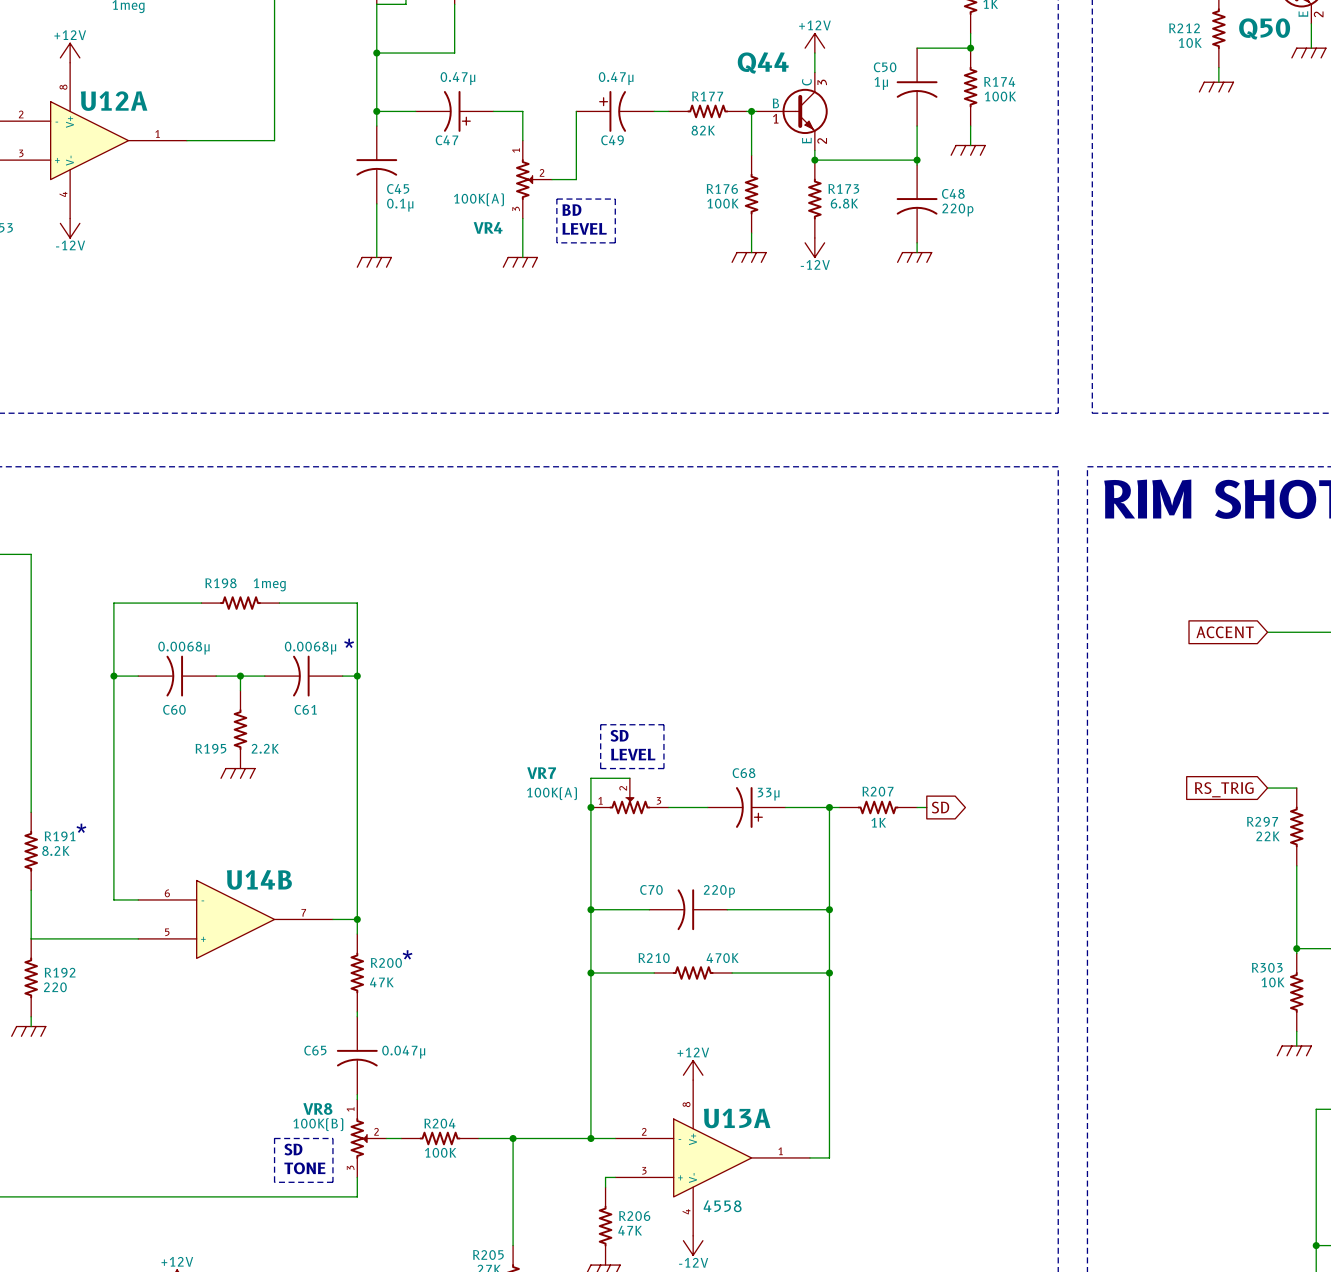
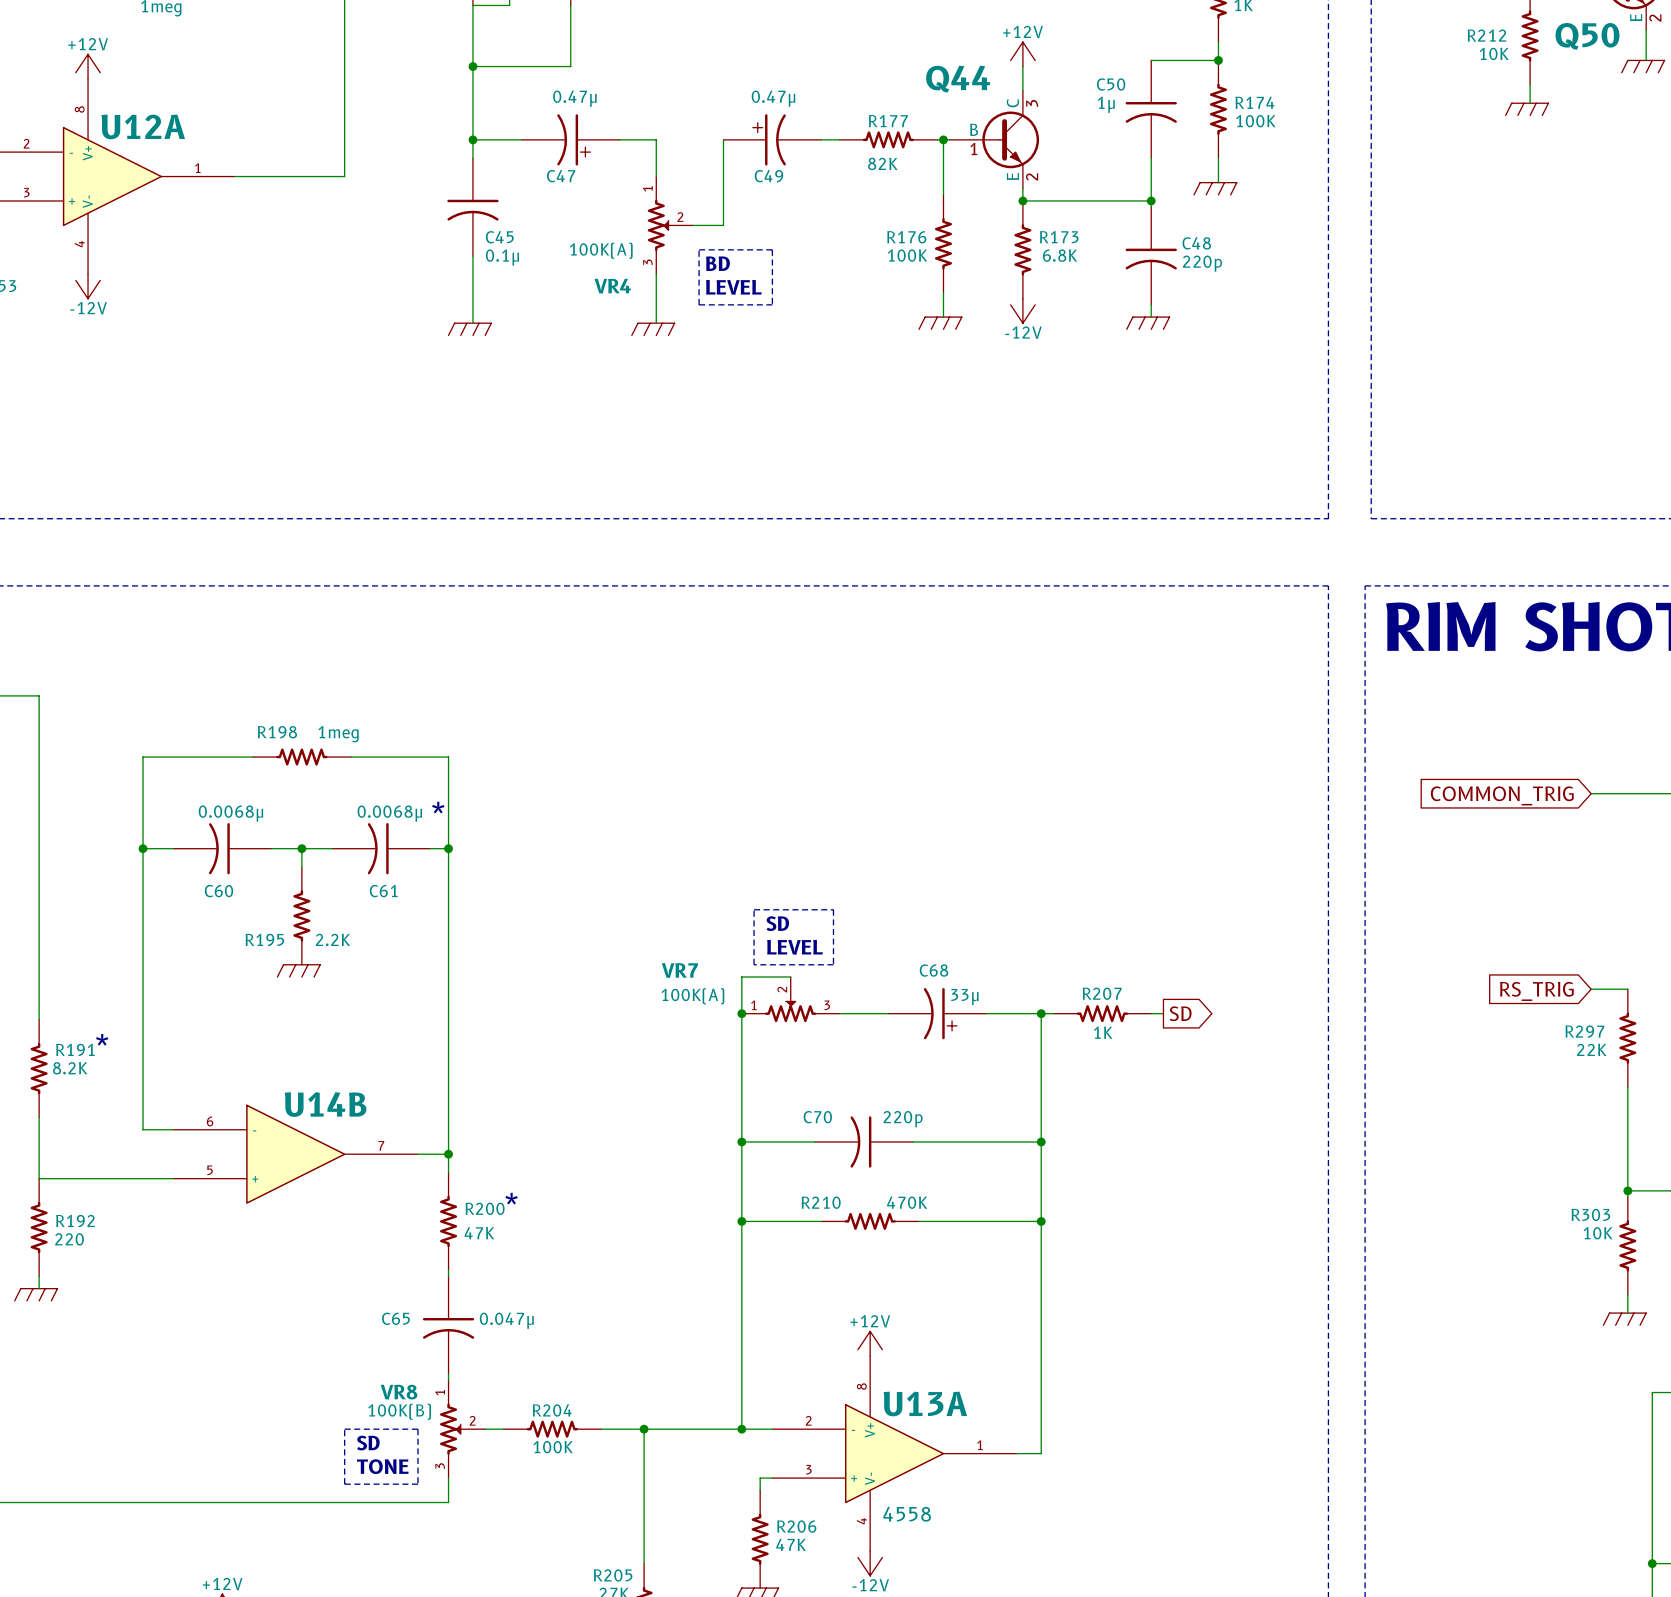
global label: ACCENT (1225, 632) -> COMMON_TRIG (1502, 795)

